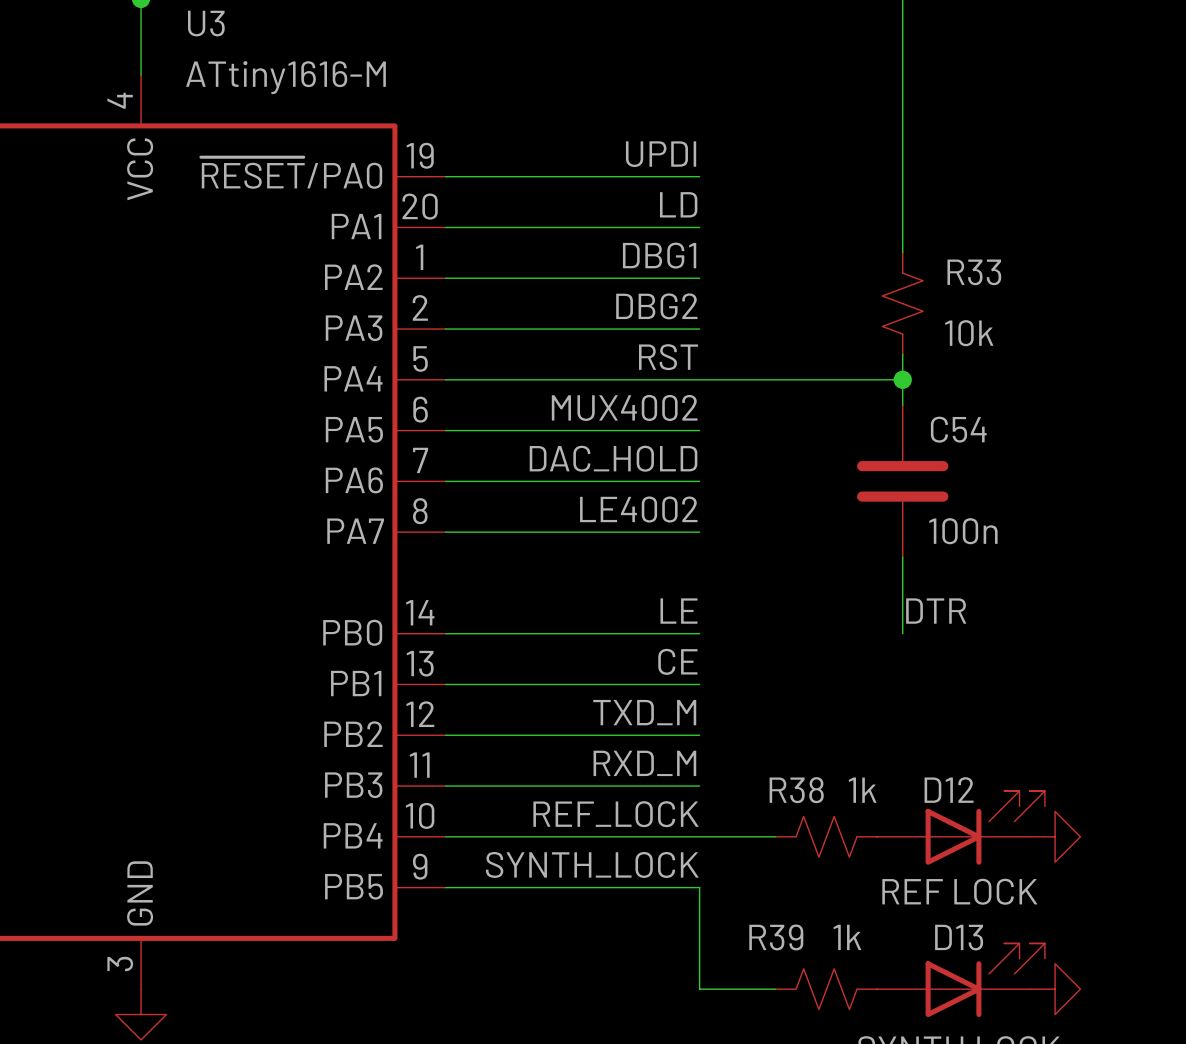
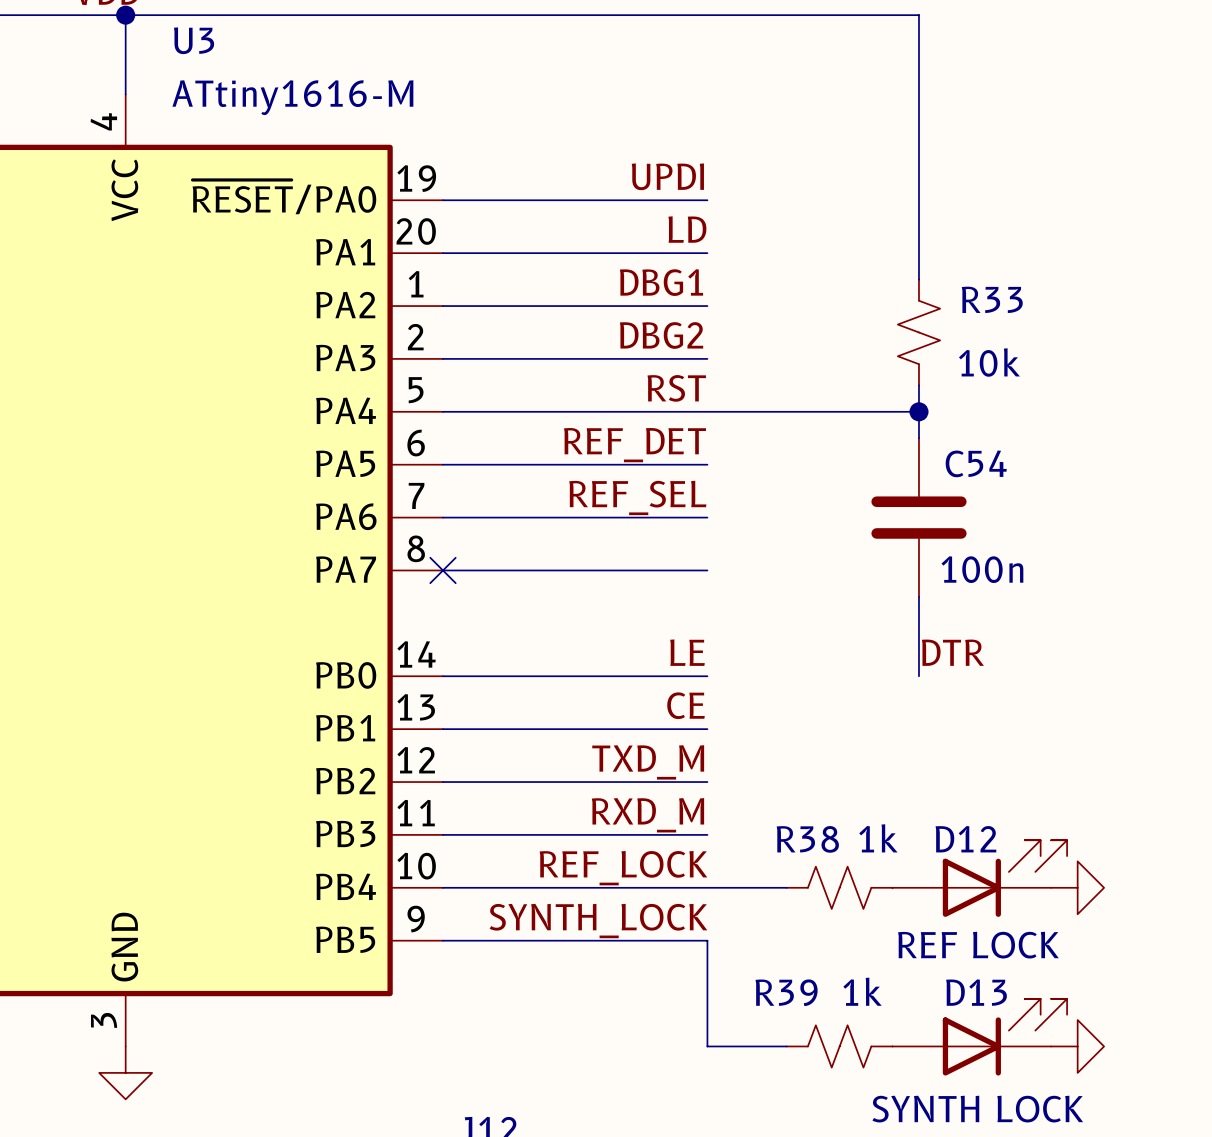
label: MUX4002 (624, 407) -> REF_DET (634, 445)
label: DAC_HOLD (613, 458) -> REF_SEL (637, 497)
label: LE4002 (638, 509) -> none
no-connect mark: none -> (443, 570)

